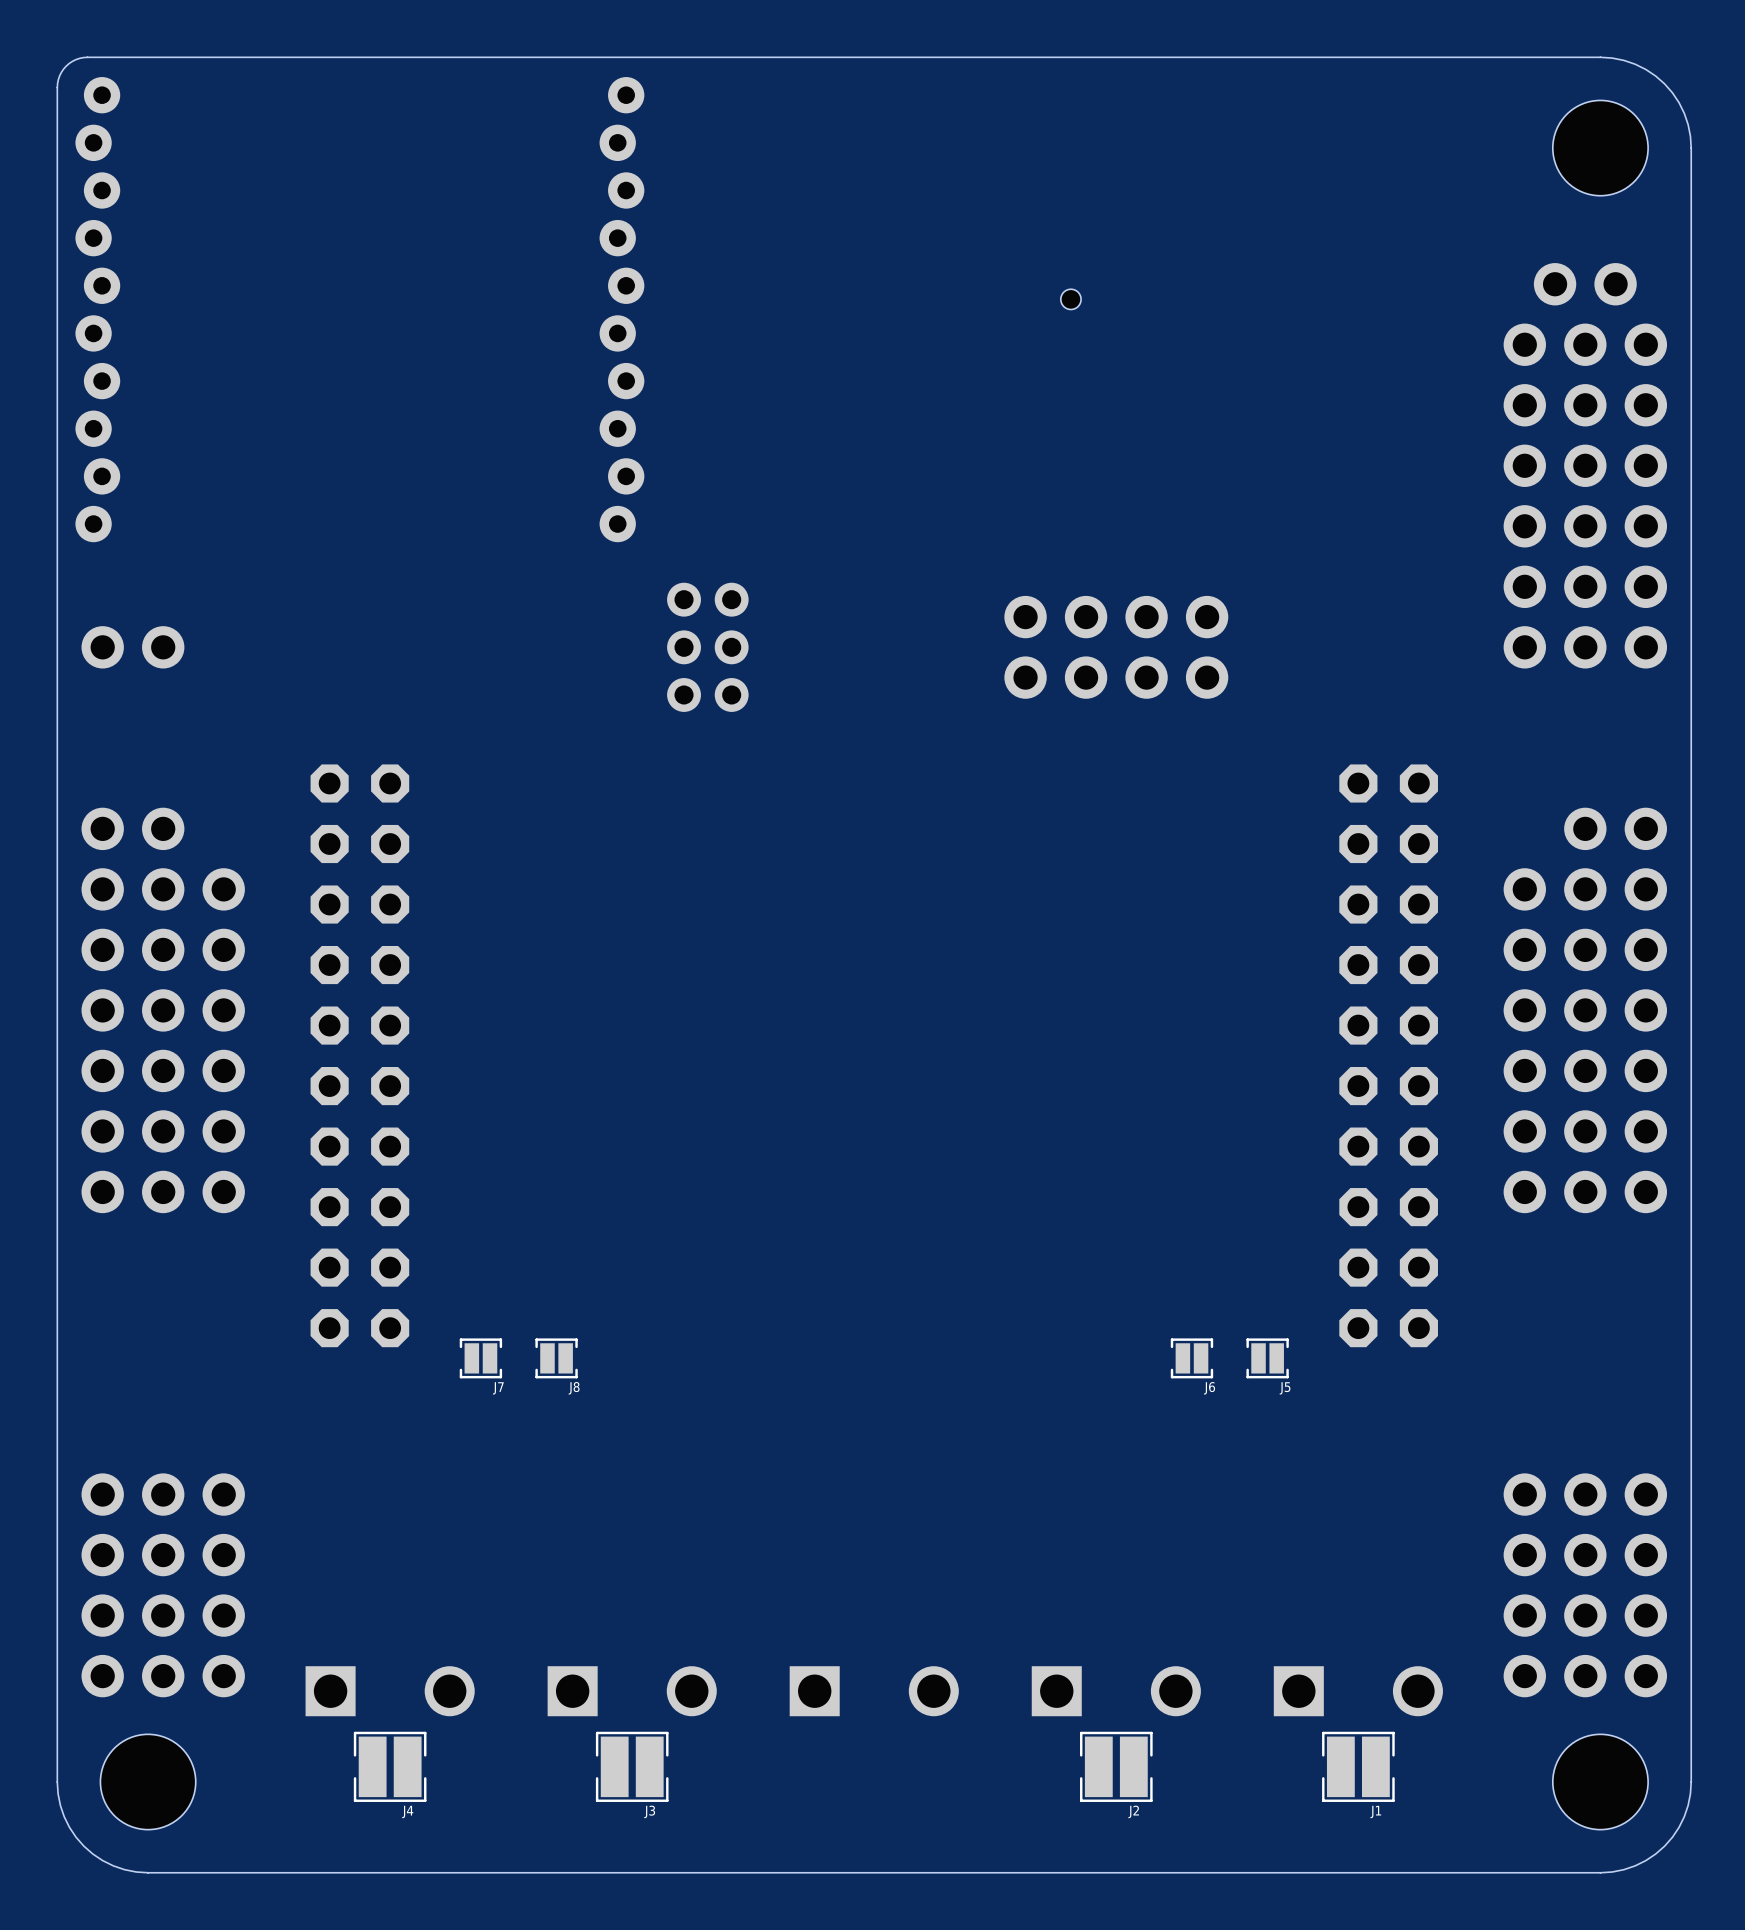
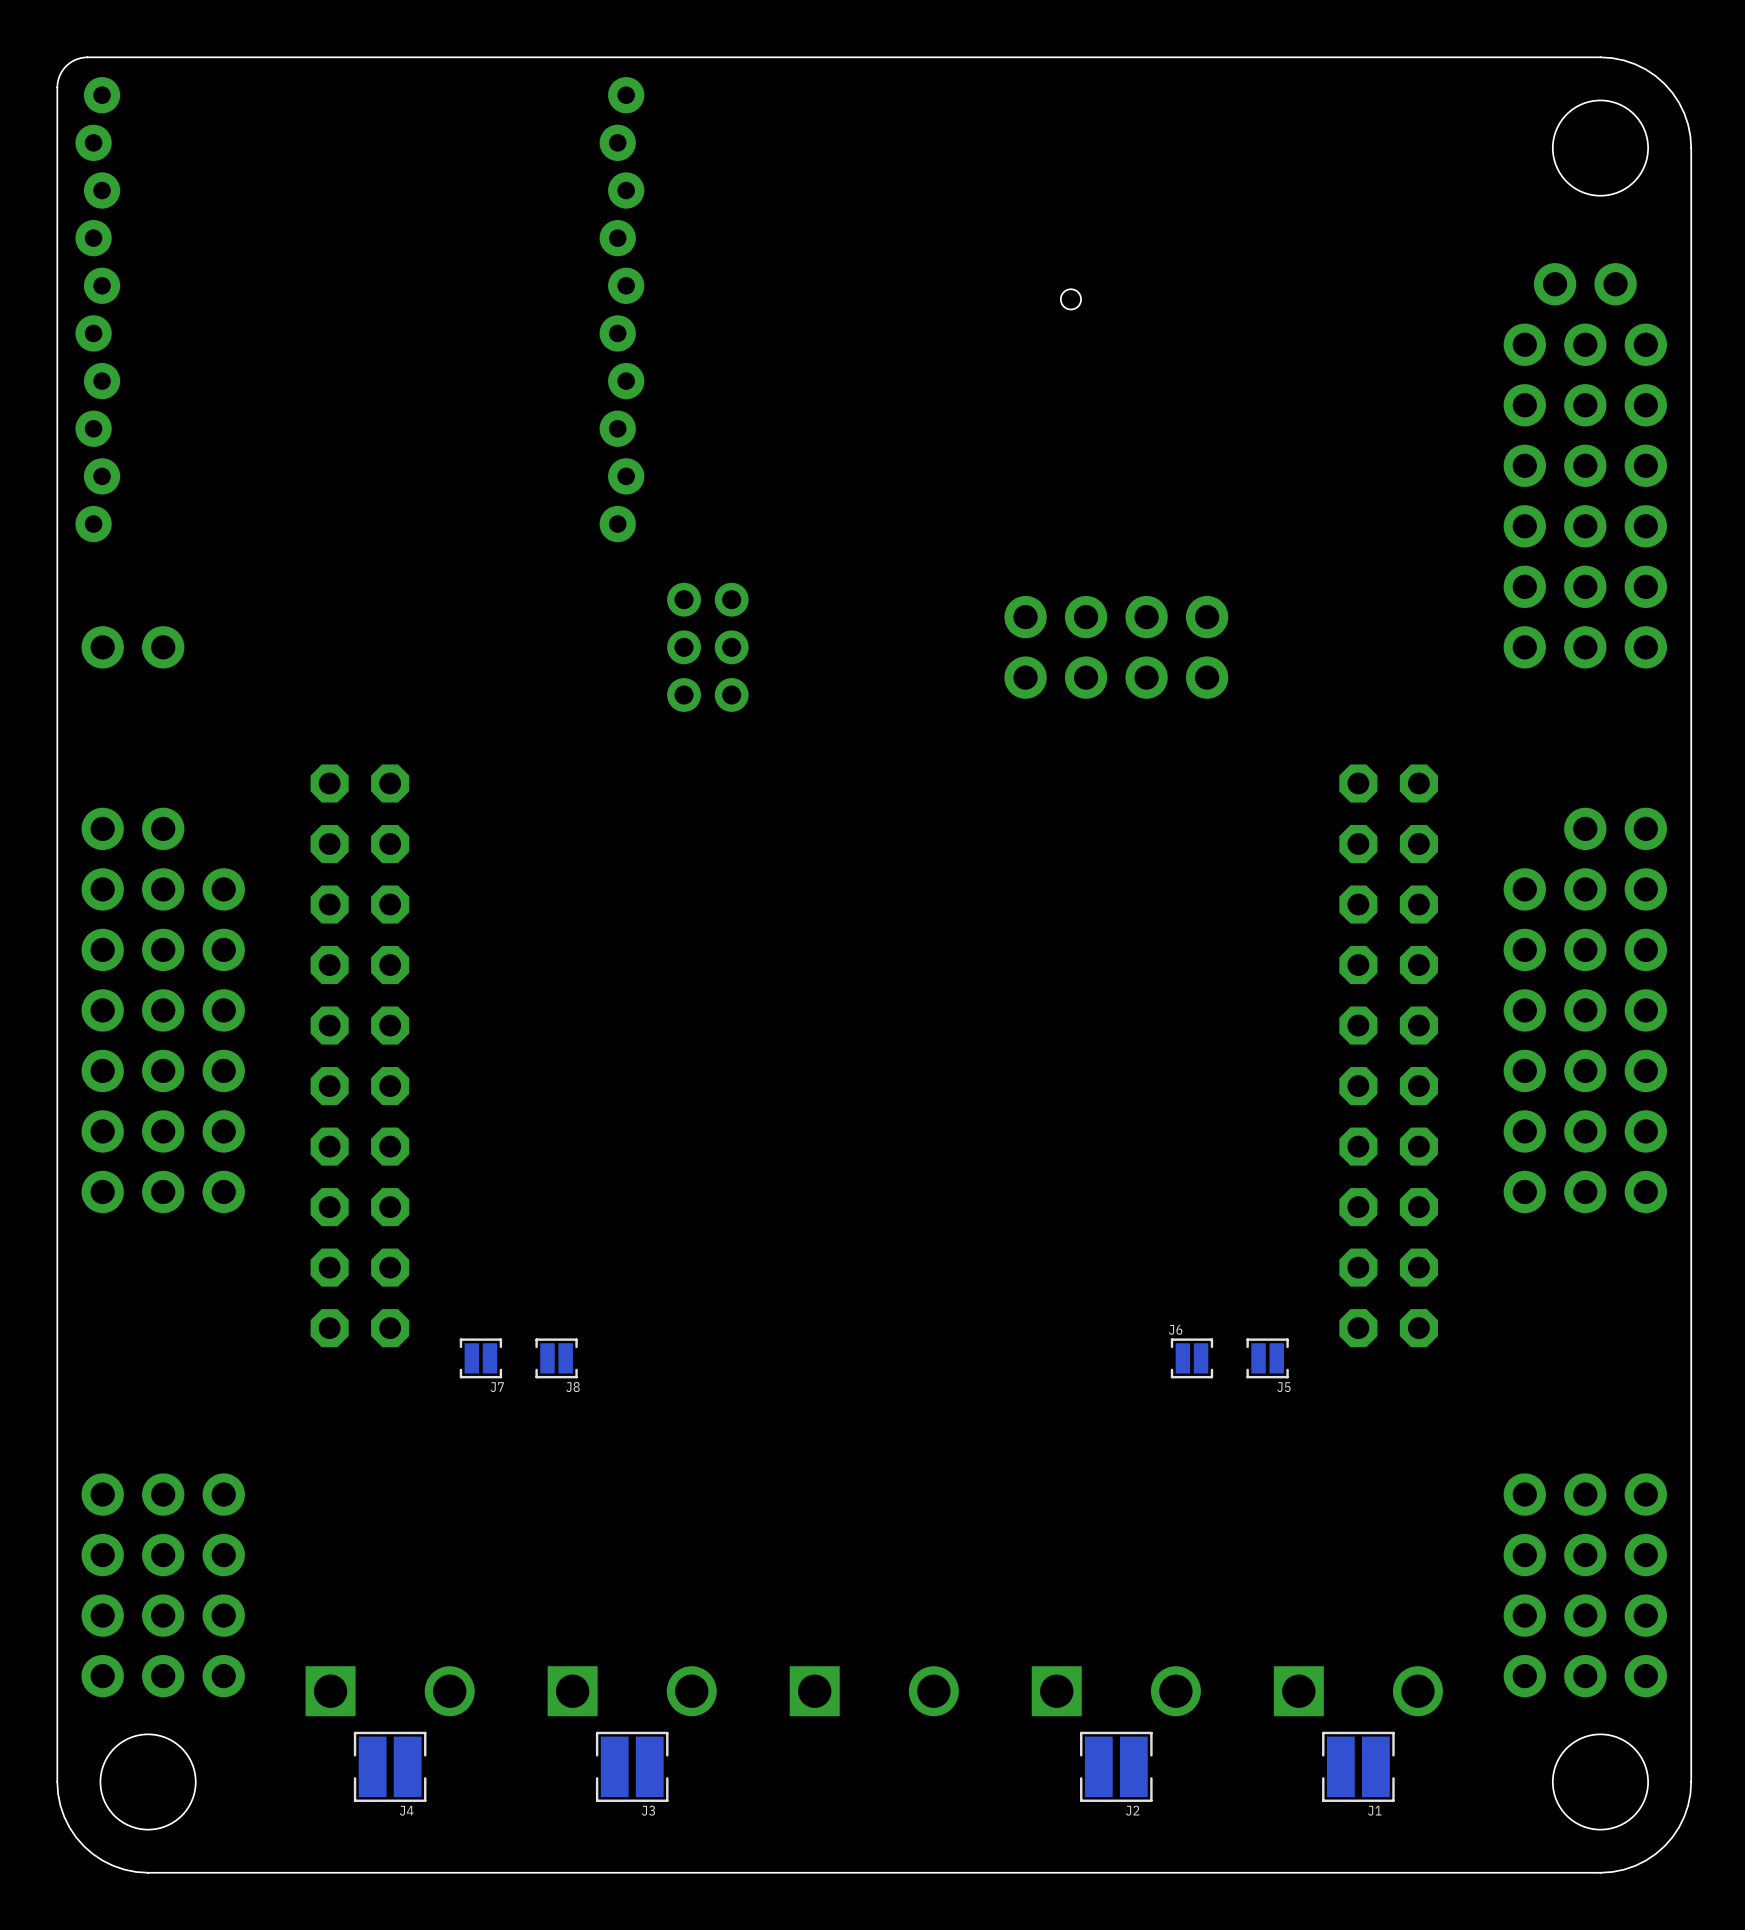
J6 name position: J6 (1209, 1388) -> J6 (1175, 1329)

